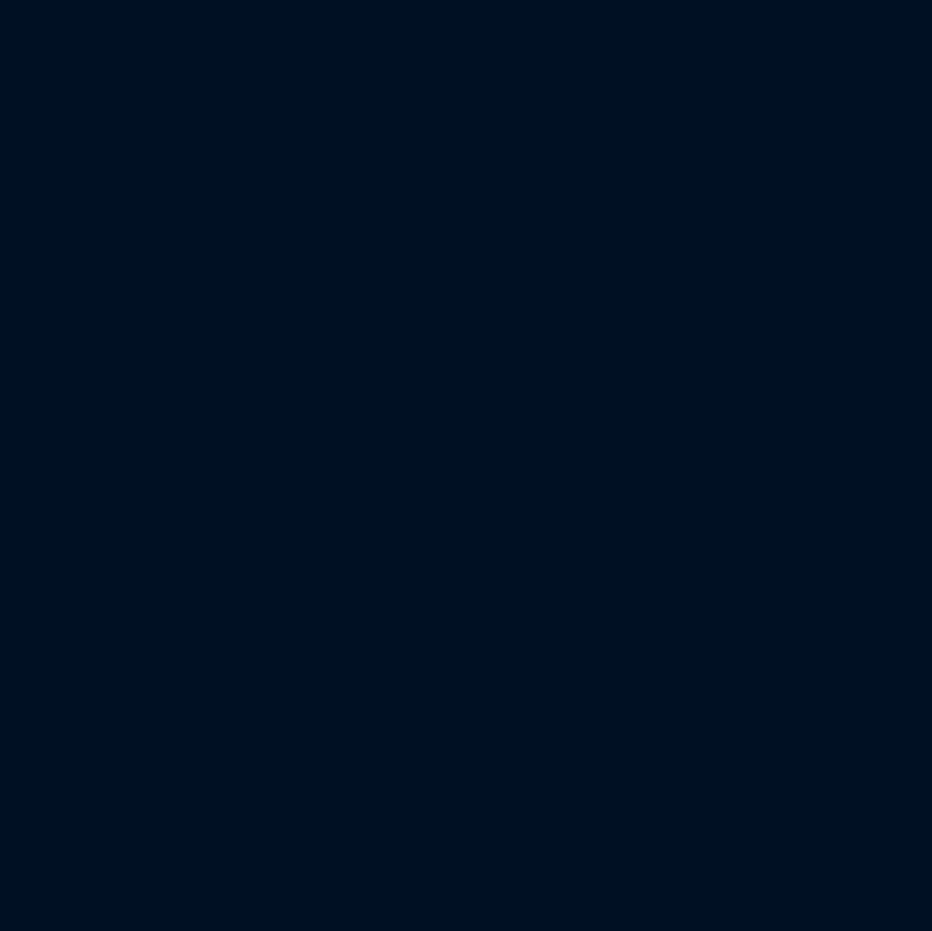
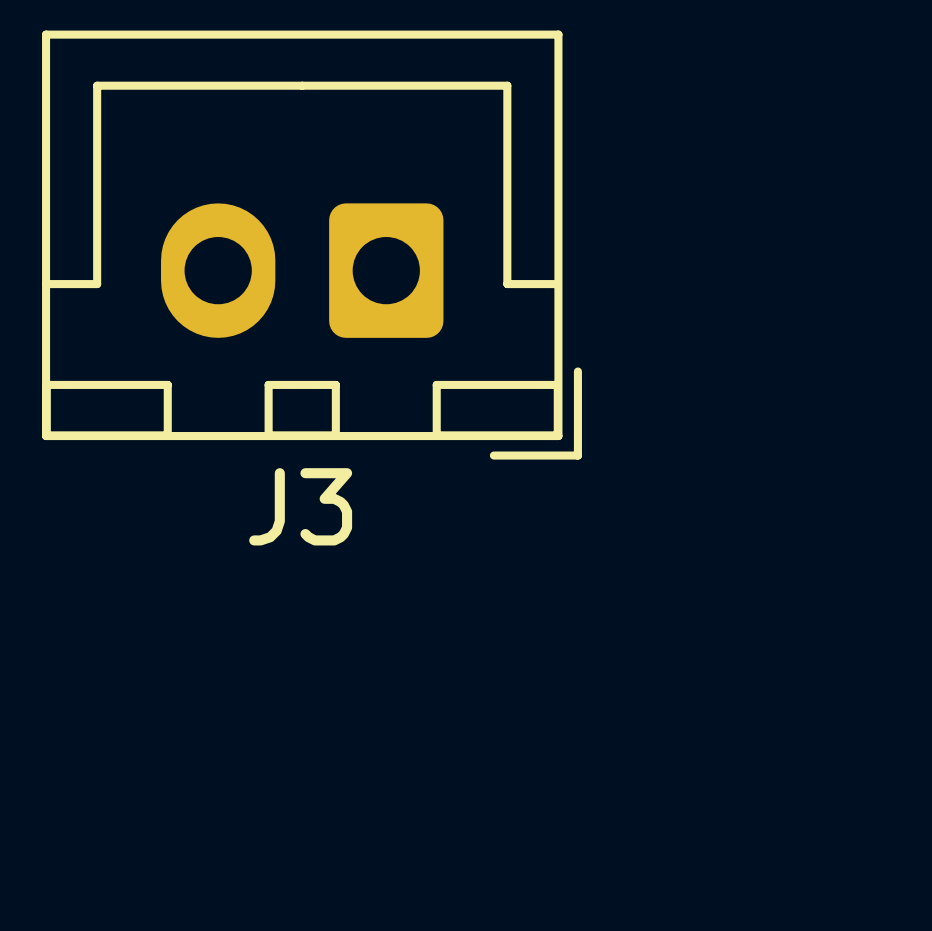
J3: none -> (311, 245)

